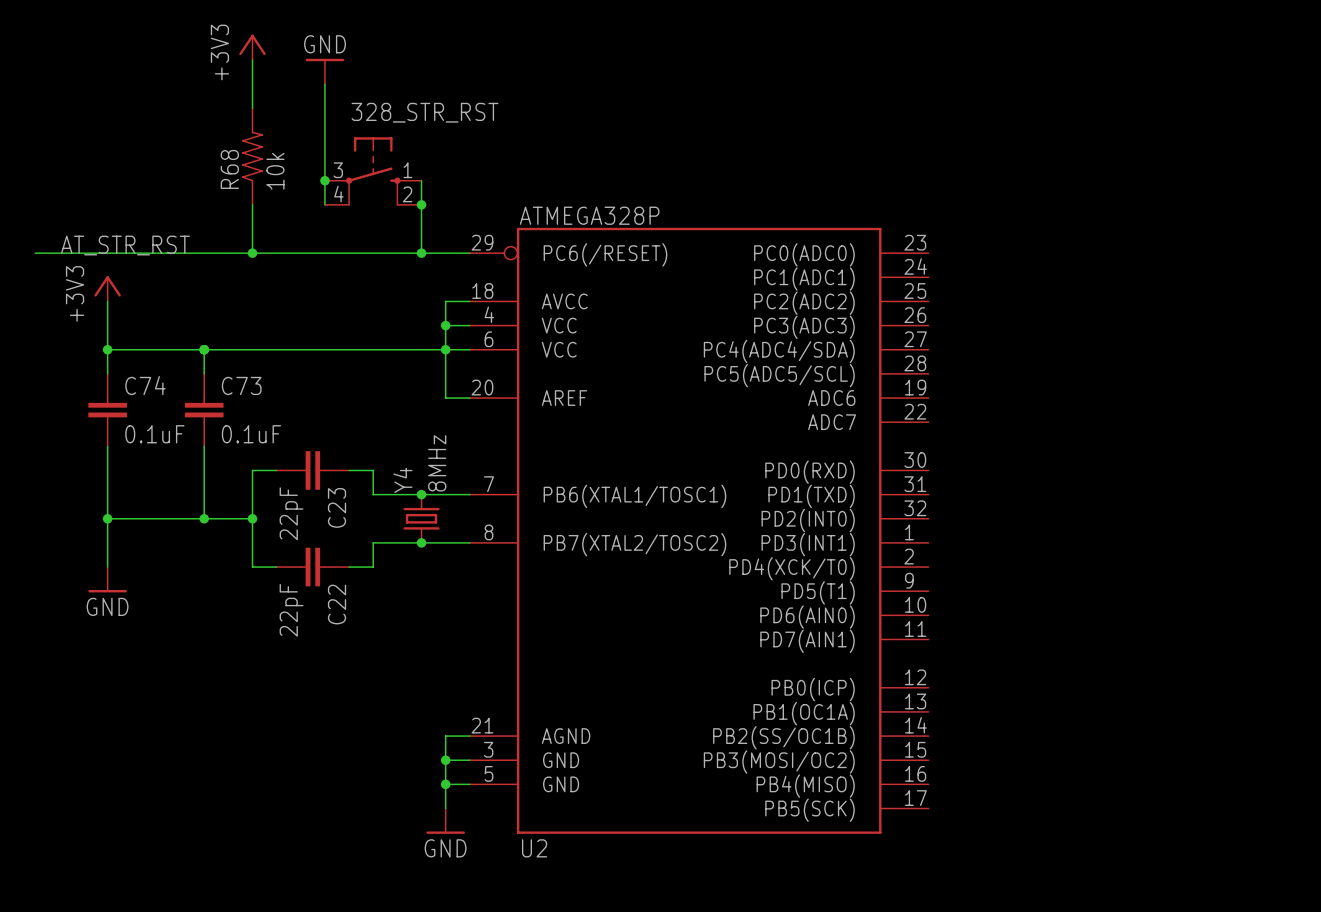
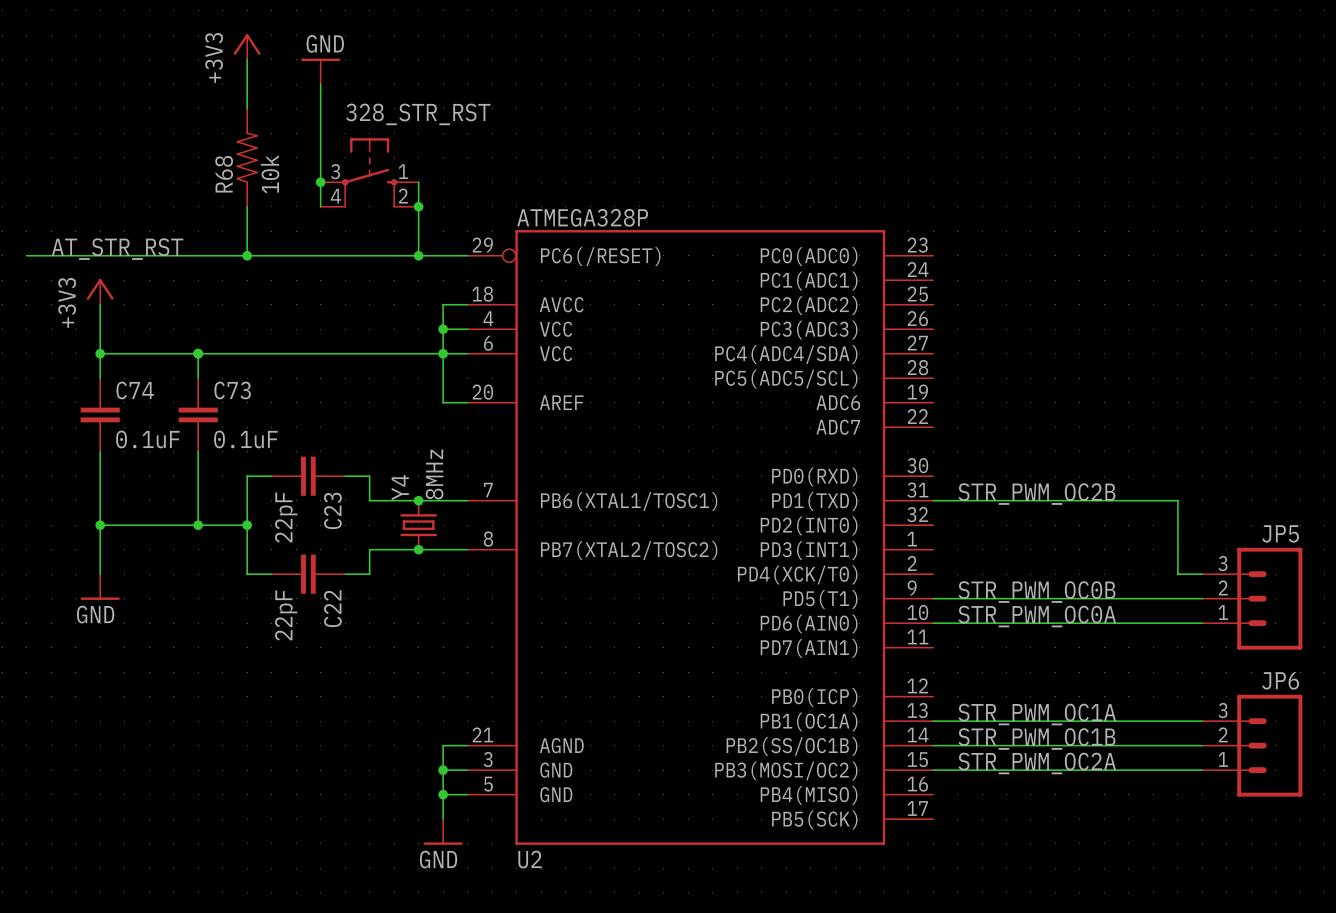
label: none -> STR_PWM_OC2B (1036, 494)
wire: none -> (933, 500) (1177, 500) (1177, 574) (1202, 574)
label: none -> STR_PWM_OC0B (1036, 592)
wire: none -> (933, 598) (1202, 598)
JP5: none -> (1252, 598)
label: none -> STR_PWM_OC0A (1037, 616)
wire: none -> (933, 623) (1202, 623)
label: none -> STR_PWM_OC1A (1037, 714)
wire: none -> (933, 721) (1202, 721)
label: none -> STR_PWM_OC1B (1036, 739)
wire: none -> (933, 745) (1202, 745)
JP6: none -> (1252, 745)
label: none -> STR_PWM_OC2A (1037, 763)
wire: none -> (933, 770) (1202, 770)

